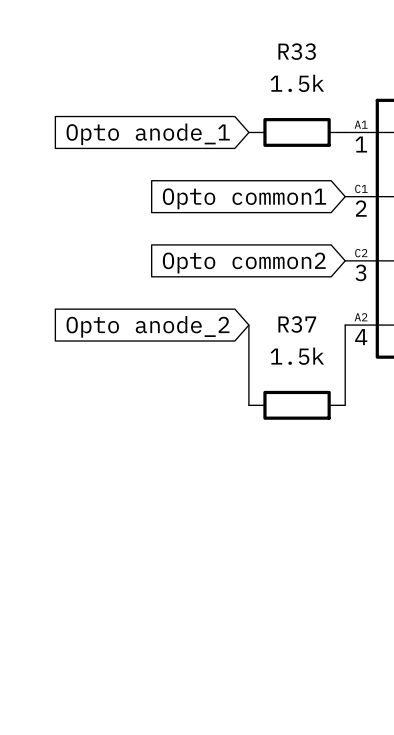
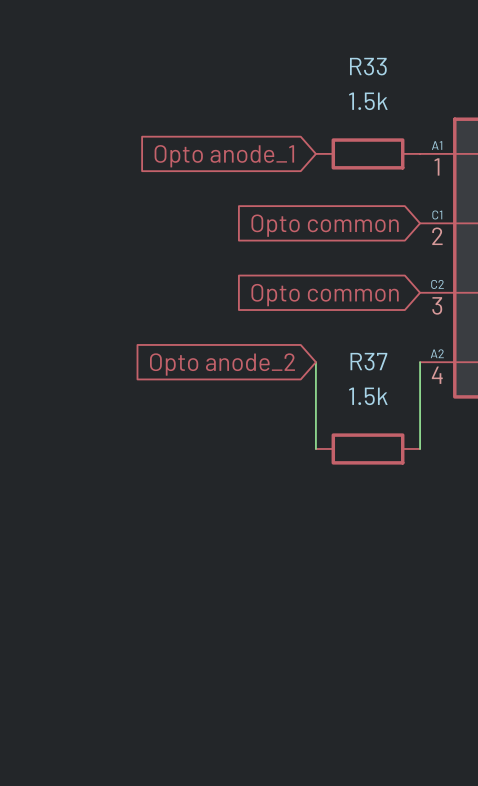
global label: Opto common1 (244, 198) -> Opto common (325, 225)
global label: Opto common2 (244, 263) -> Opto common (325, 295)

